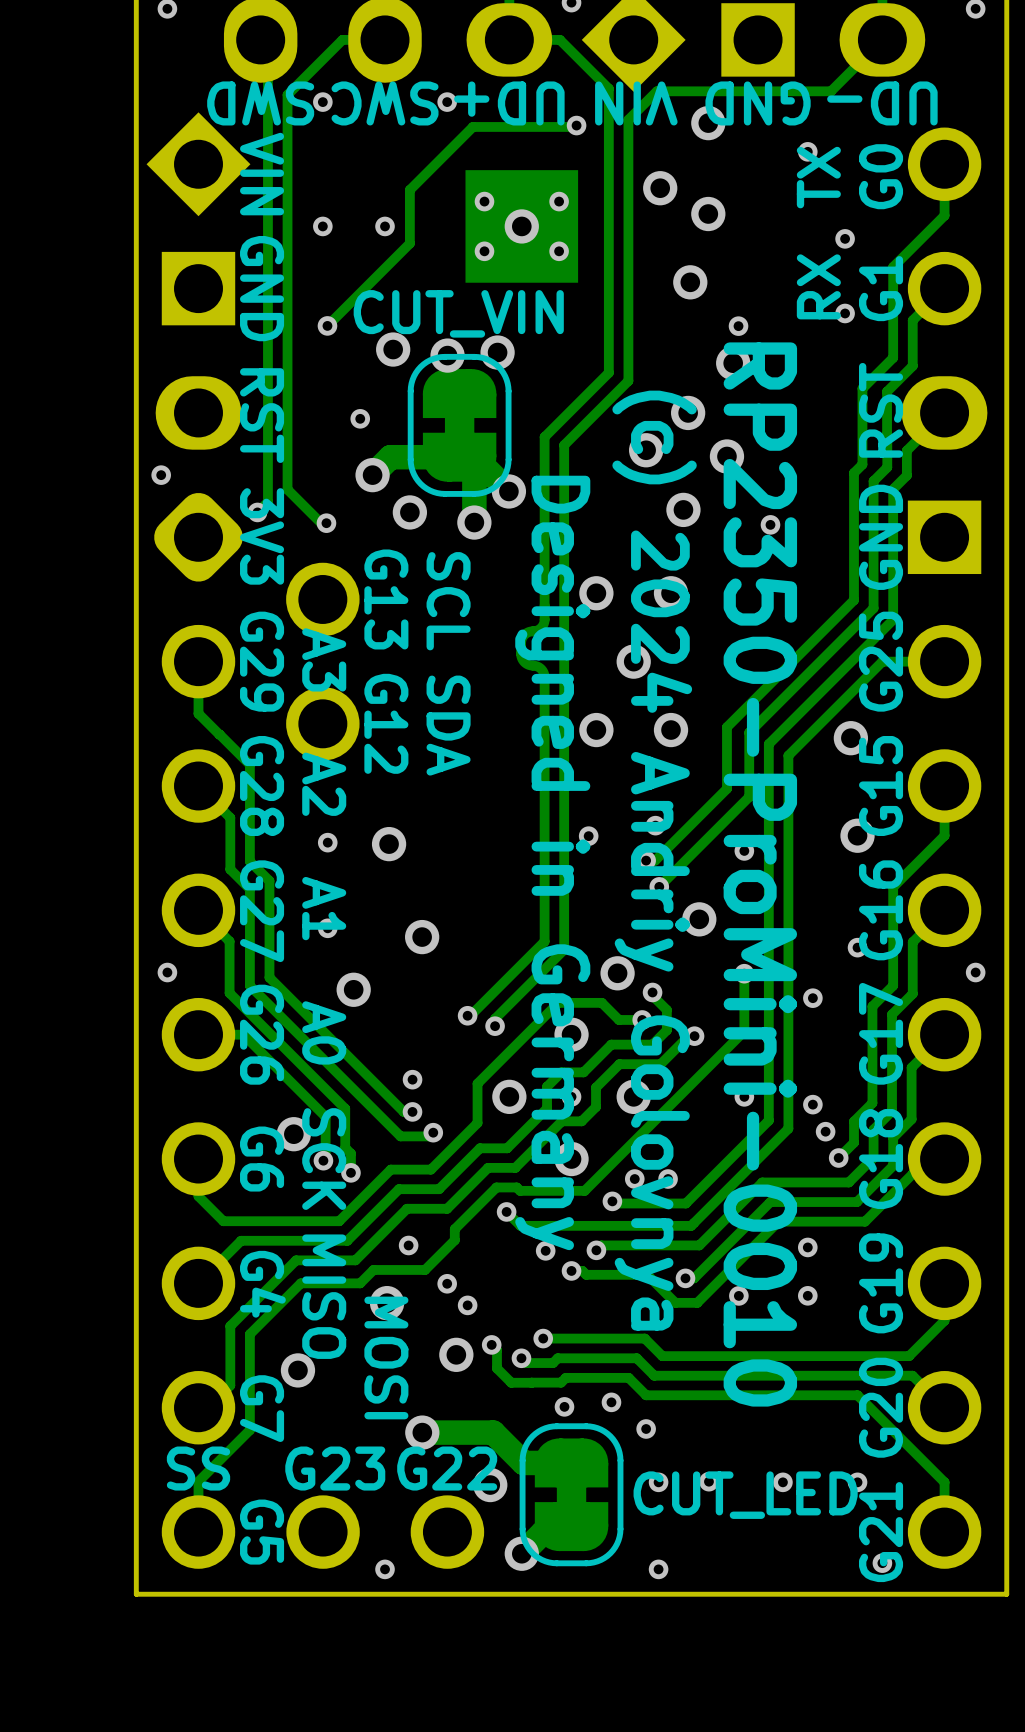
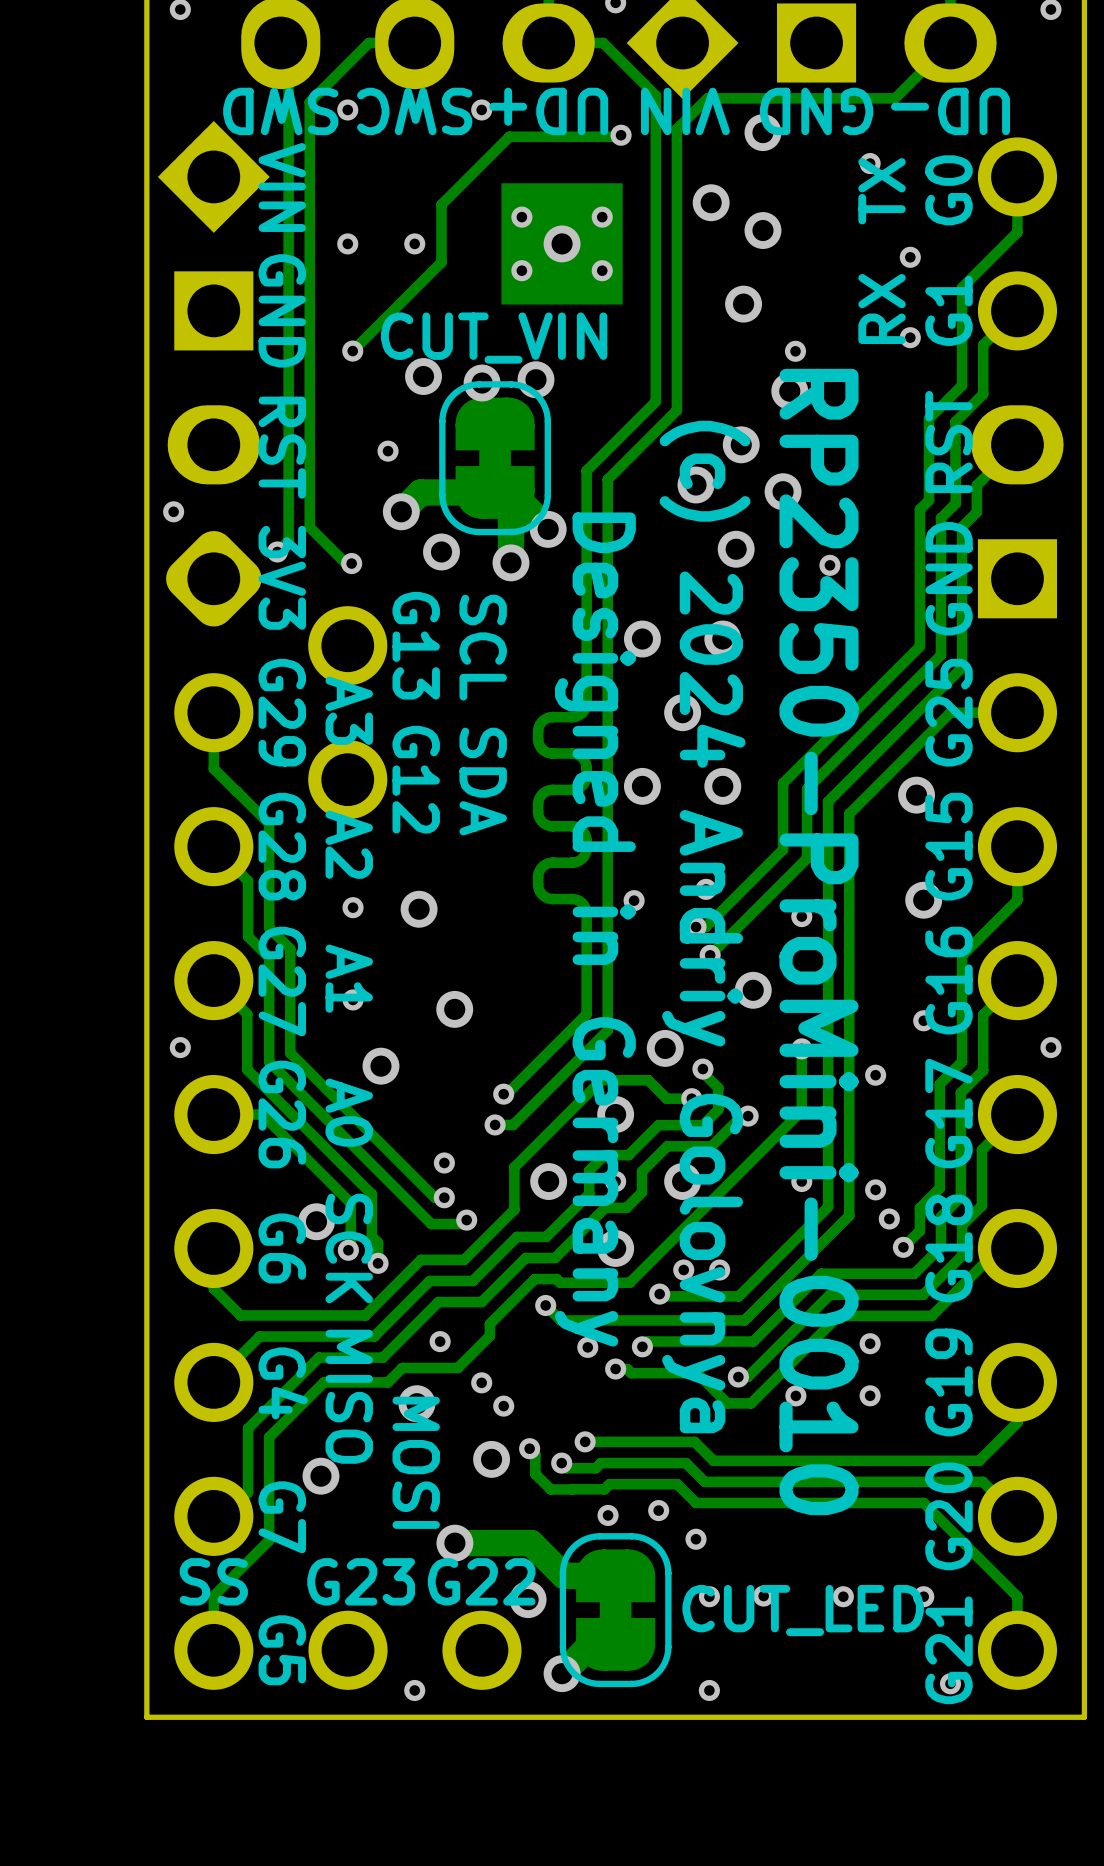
track: (544, 619) (541, 627) (525, 633) (521, 643) (521, 655) (523, 661) (528, 664) (539, 667) (543, 673) (544, 713) -> (586, 667) (586, 704) (583, 711) (573, 717) (547, 718) (540, 724) (538, 731) (538, 742) (543, 750) (550, 753) (577, 754) (584, 760) (586, 768)
track: (544, 719) (544, 780) -> (586, 775) (584, 782) (579, 787) (547, 791) (540, 797) (538, 804) (538, 815) (543, 823) (550, 826) (577, 827) (583, 831) (586, 840)
track: (544, 787) (544, 848) -> (586, 848) (584, 855) (579, 860) (547, 863) (540, 869) (538, 877) (538, 888) (543, 896) (550, 898) (577, 900) (583, 904) (586, 913)
track: (564, 949) (495, 1018) (495, 1026) -> (607, 1022) (607, 1030) (513, 1124) (495, 1124)
via position: (495, 1026) -> (495, 1124)

